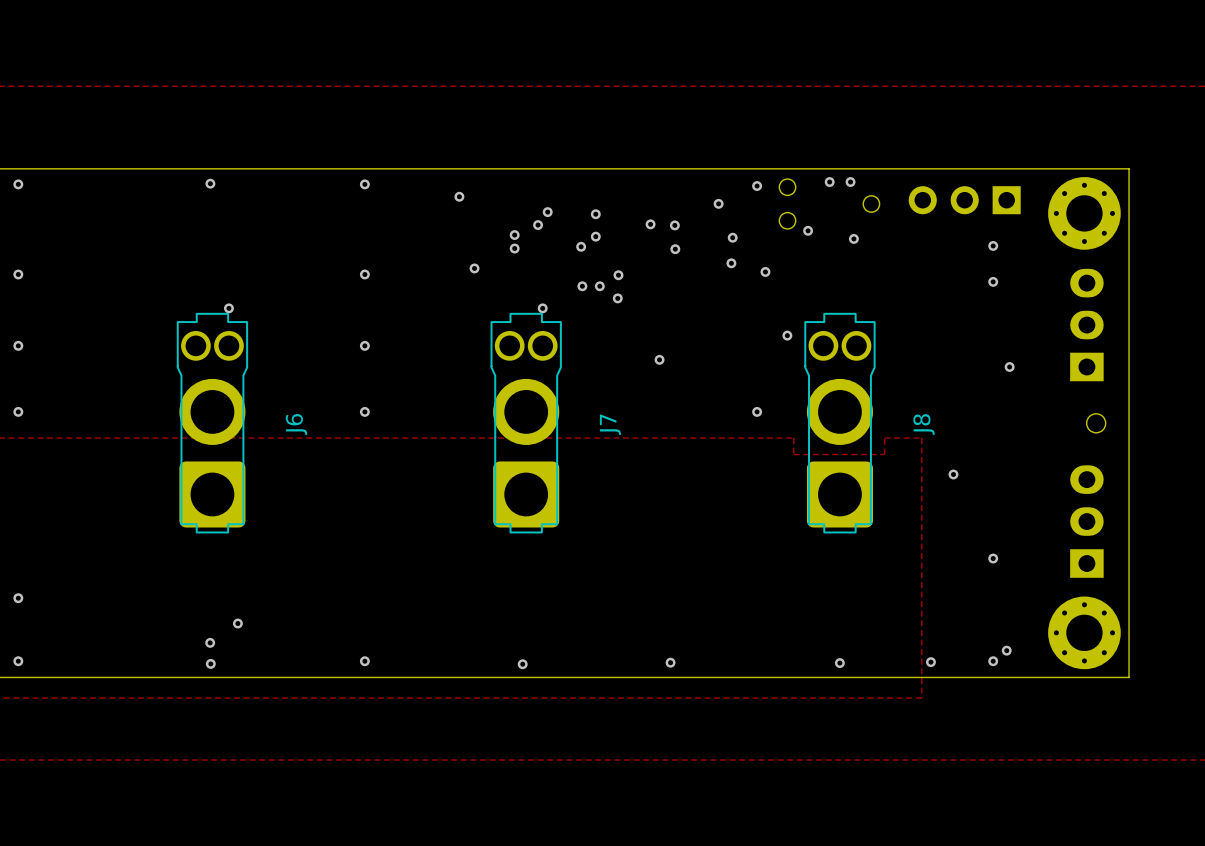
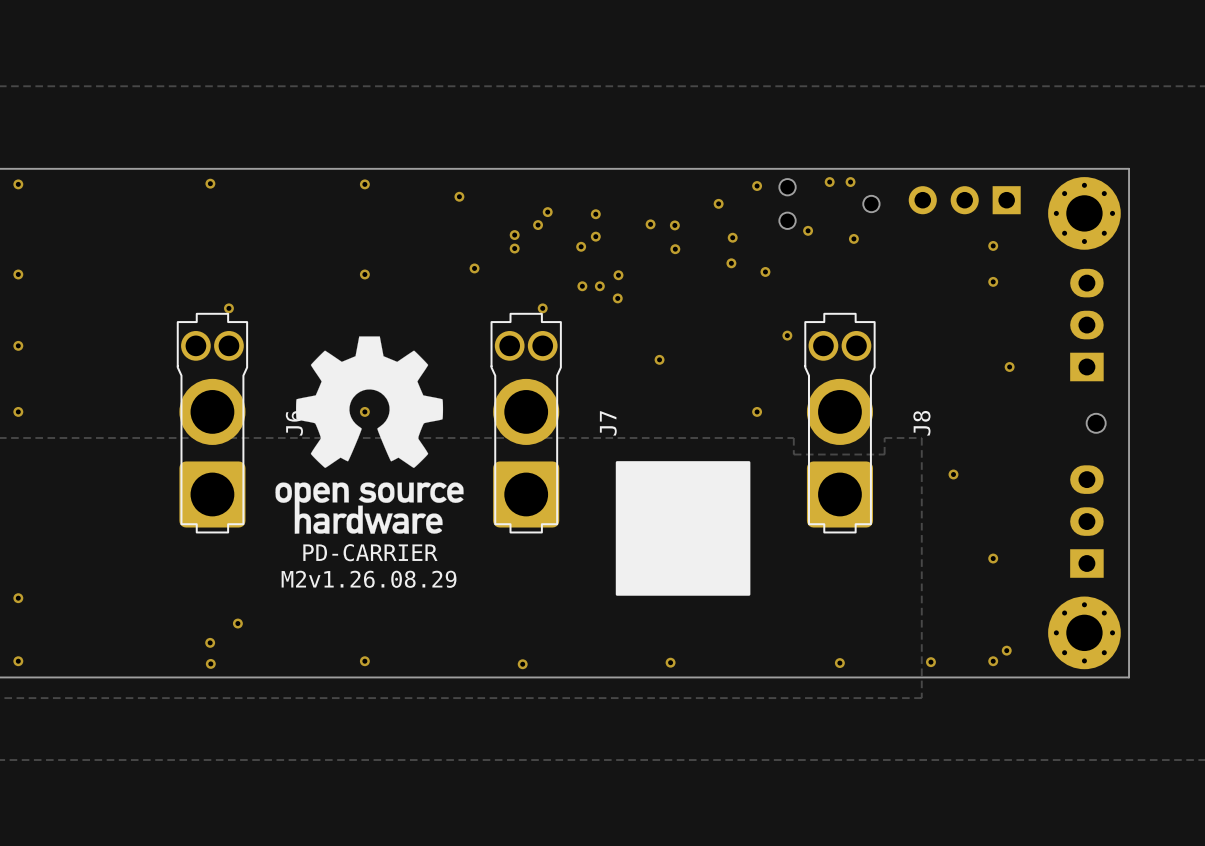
drawing: none -> [275, 336, 464, 534]
drawing: none -> [615, 461, 751, 596]
text: none -> PD-CARRIER (370, 552)
text: none -> M2v1.26.08.29 (369, 579)

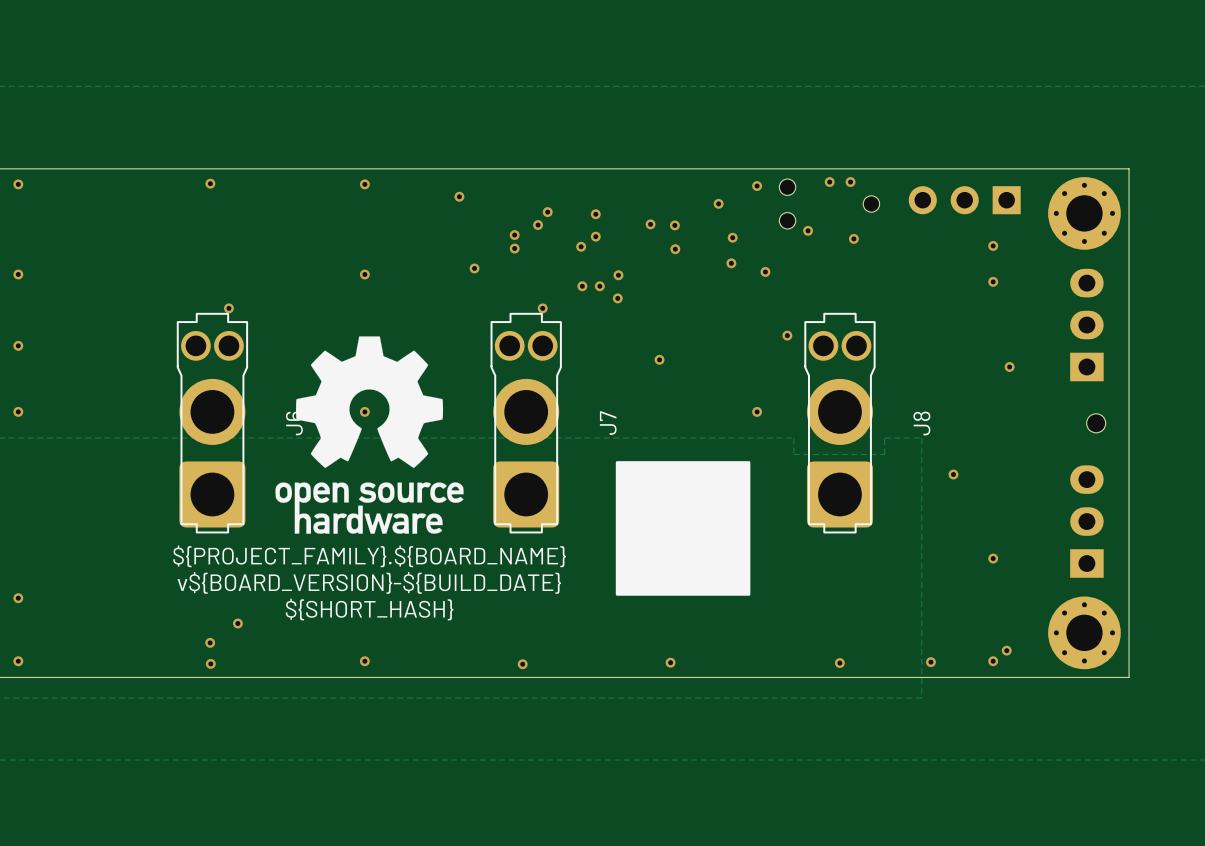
text: PD-CARRIER (370, 552) -> ${PROJECT_FAMILY}.${BOARD_NAME} (369, 556)
text: M2v1.26.08.29 (369, 579) -> v${BOARD_VERSION}-${BUILD_DATE} (369, 582)
text: none -> ${SHORT_HASH} (369, 609)

